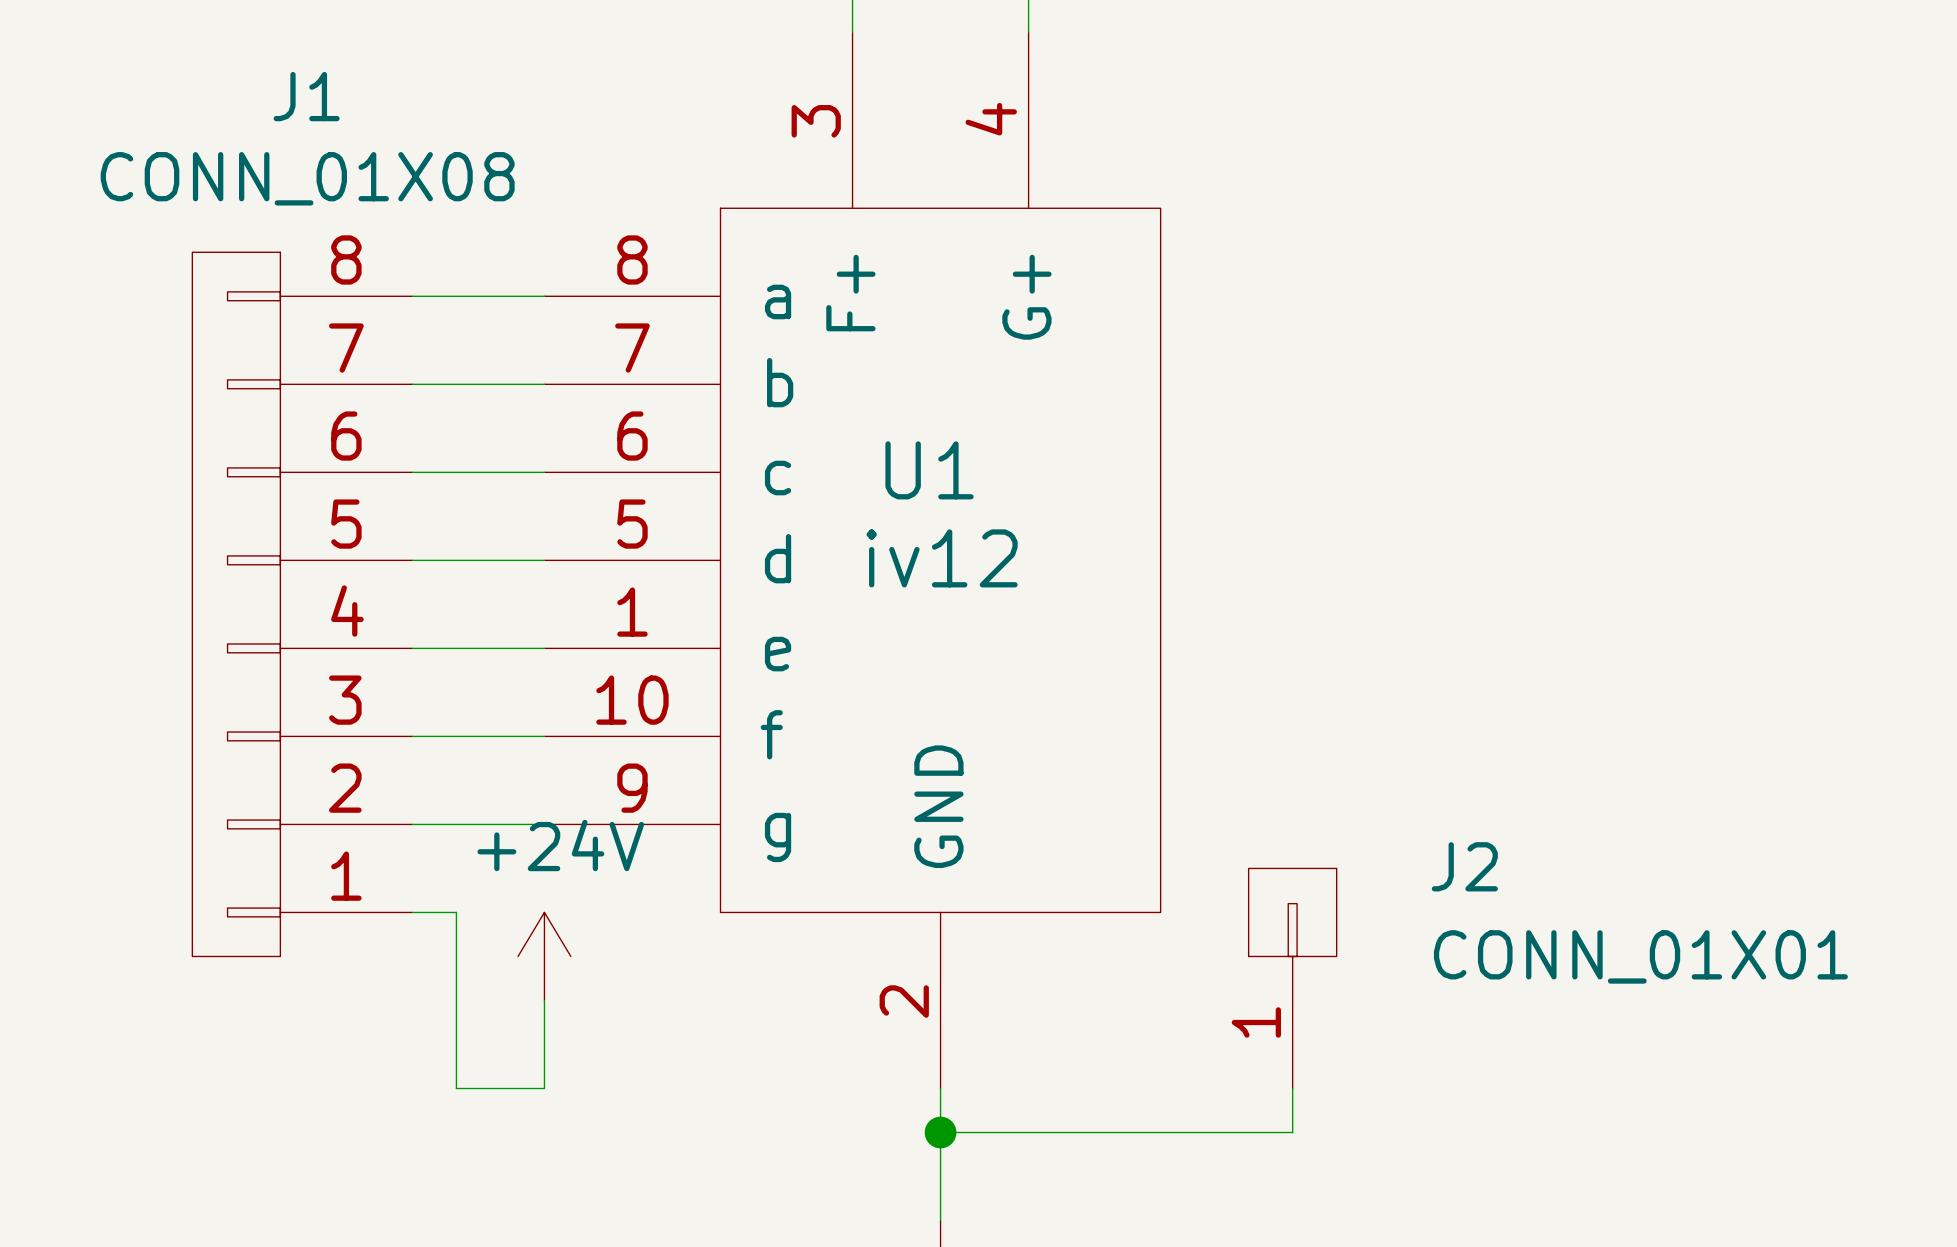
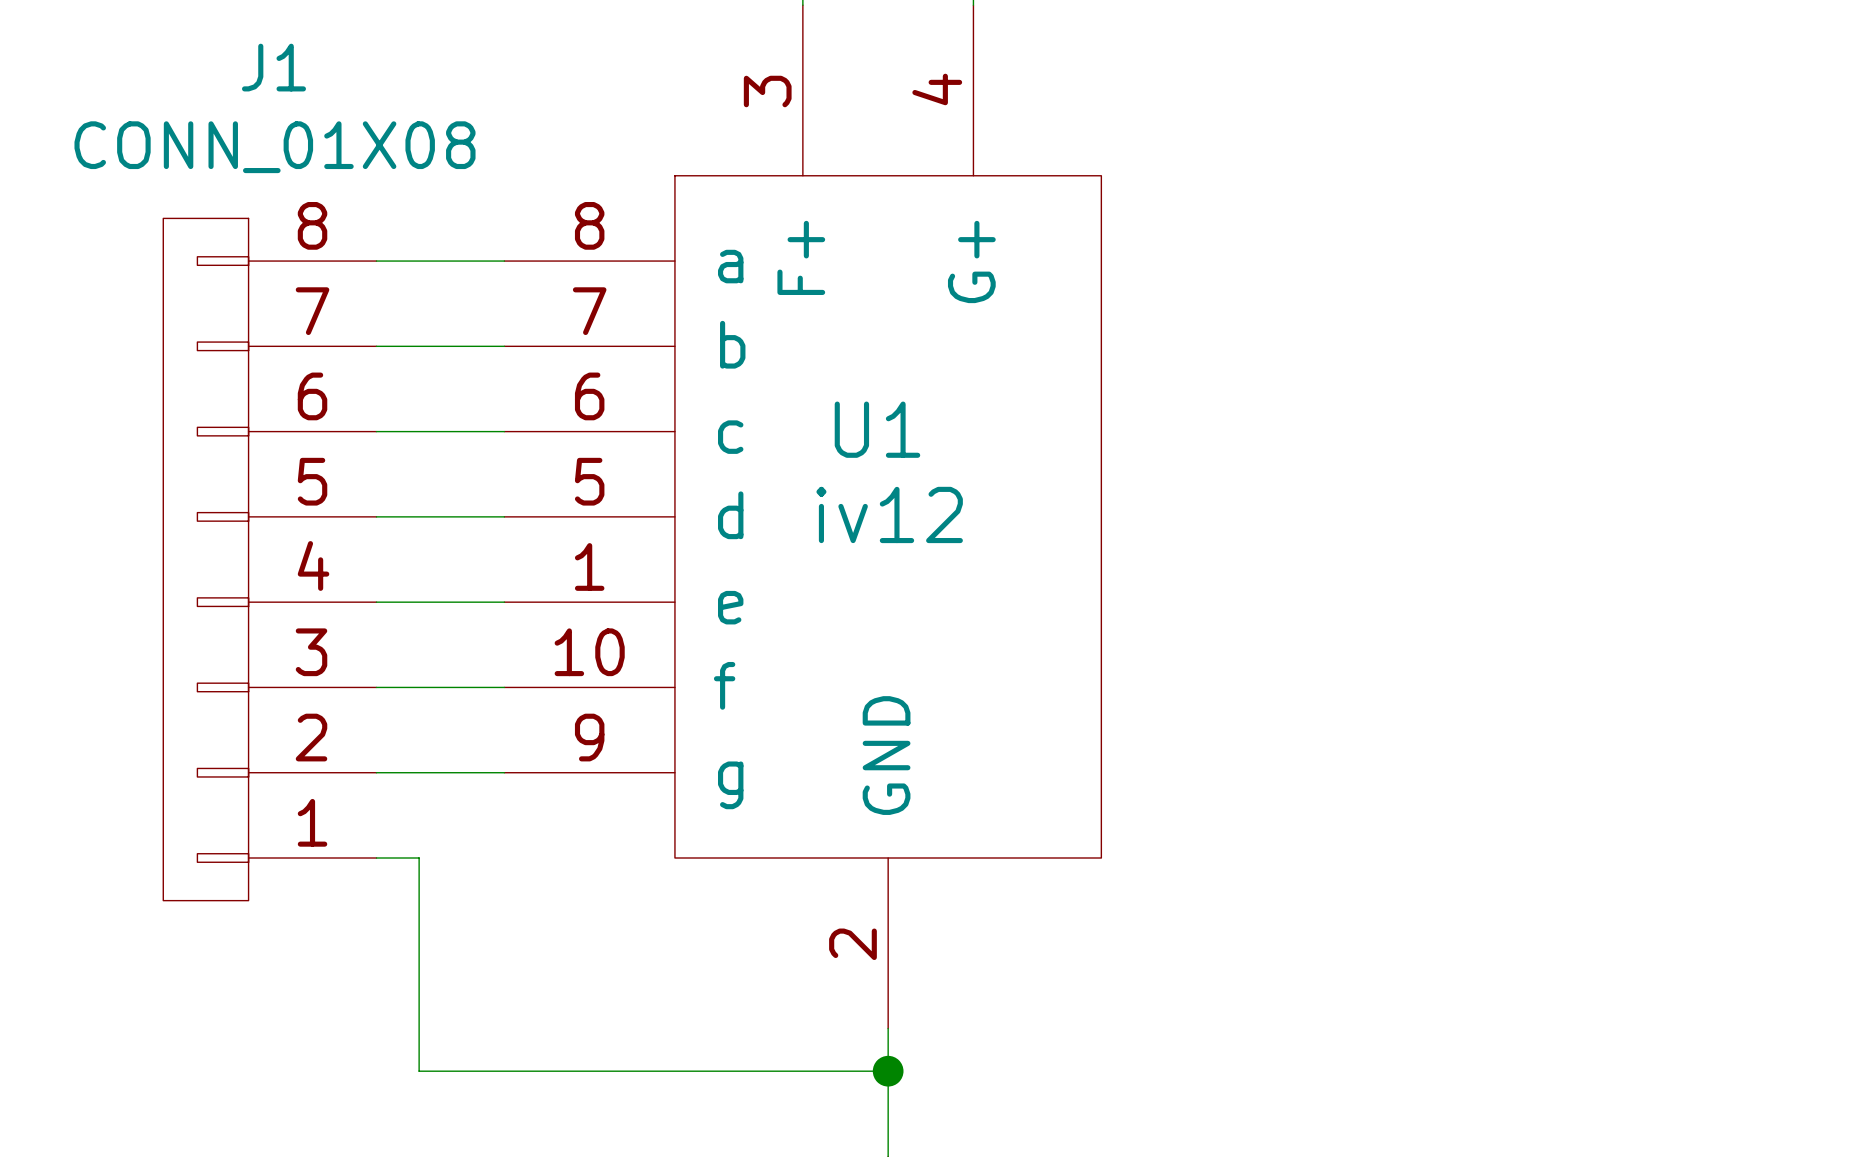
power symbol: +24V (544, 956) -> none
J2: CONN_01X01 (1292, 978) -> none
wire: (544, 1000) (544, 1088) (456, 1088) -> (888, 1071) (419, 1071) (419, 1028)
wire: (1292, 1088) (1292, 1132) (940, 1132) -> none

